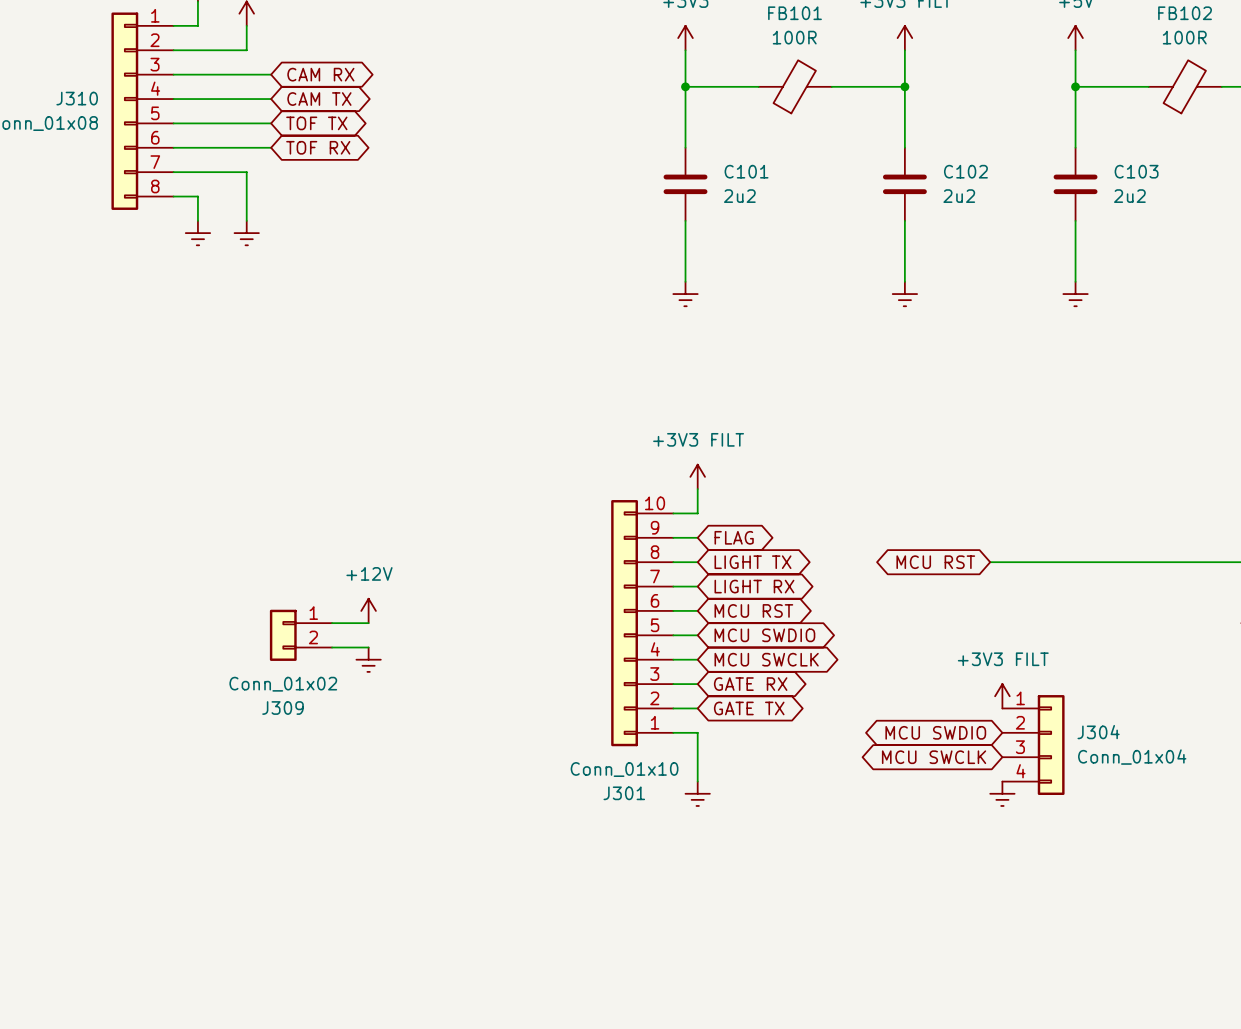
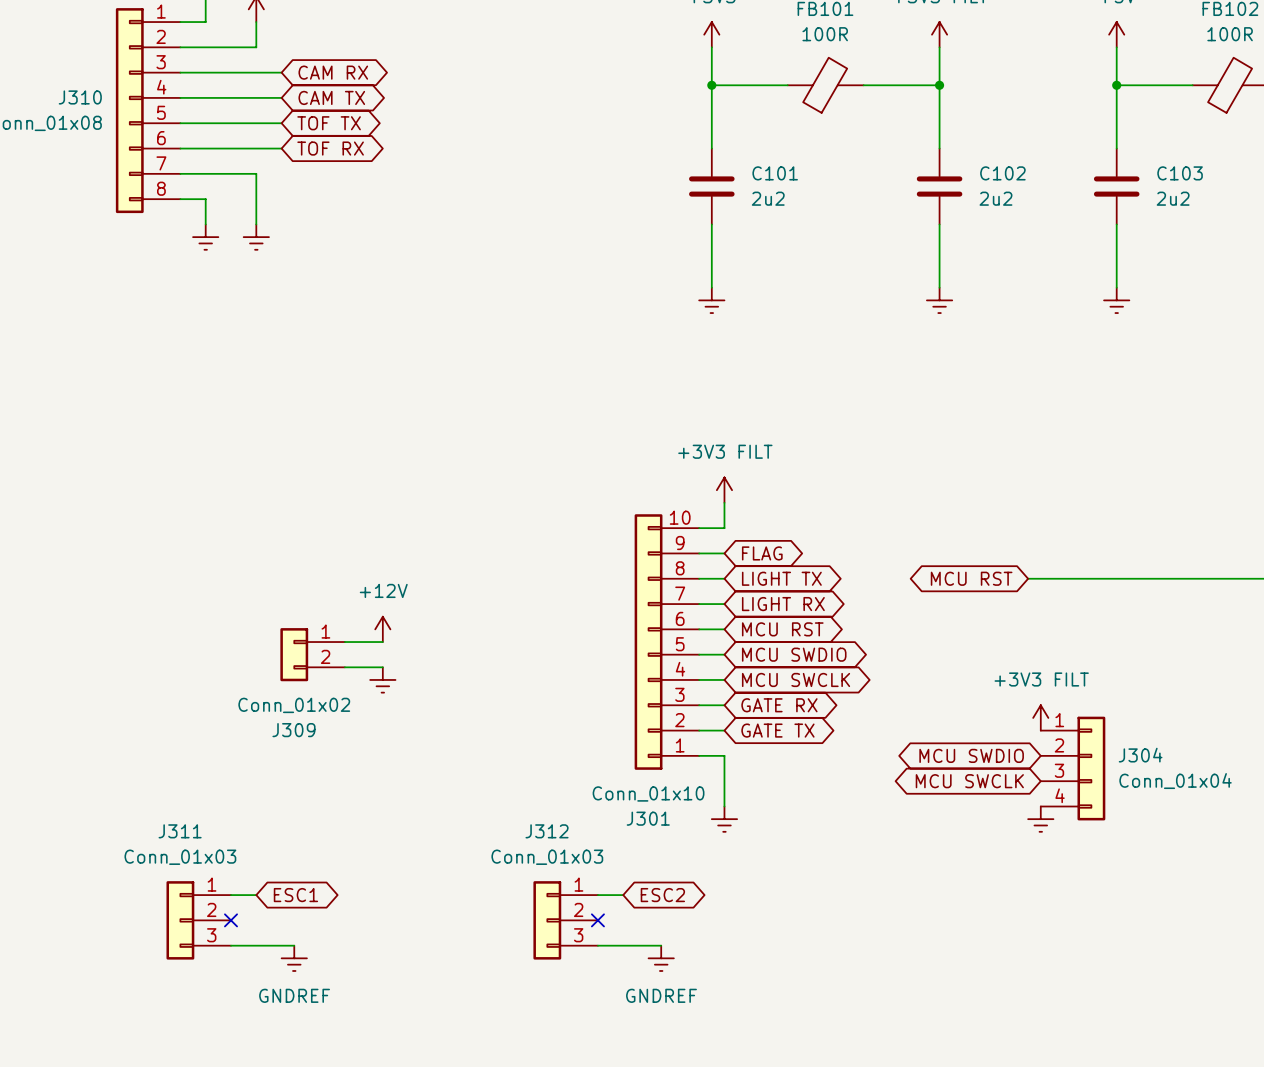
wire: none -> (231, 895) (256, 895)
global label: none -> ESC1 (295, 895)
wire: none -> (597, 895) (623, 895)
global label: none -> ESC2 (662, 895)
J311: none -> Conn_01x03 (198, 920)
no-connect mark: none -> (231, 920)
J312: none -> Conn_01x03 (565, 920)
no-connect mark: none -> (597, 920)
wire: none -> (231, 945) (294, 945)
wire: none -> (597, 945) (661, 945)
power symbol: none -> GNDREF (294, 958)
power symbol: none -> GNDREF (661, 958)

